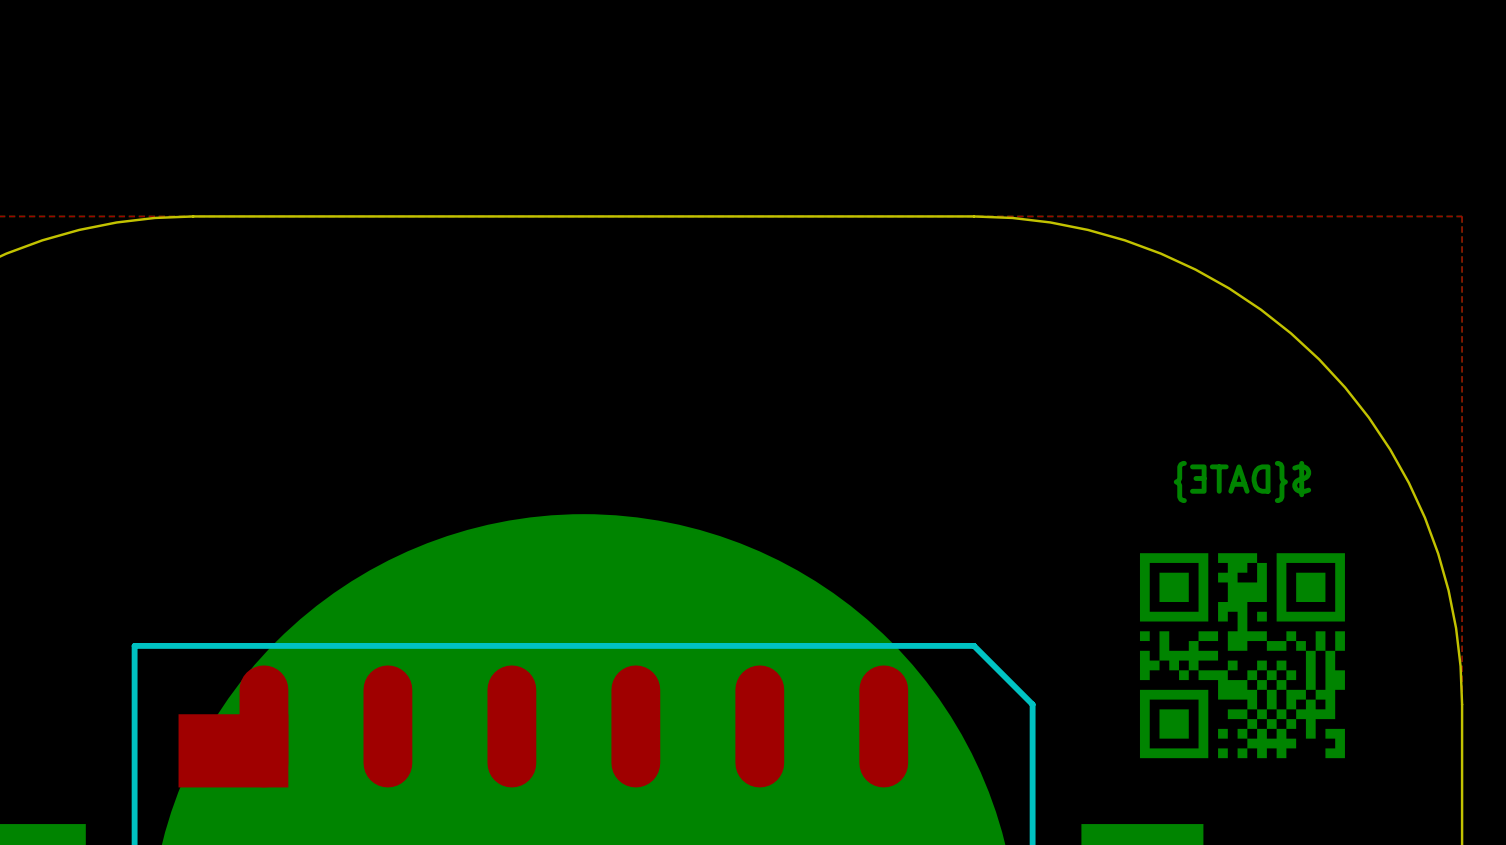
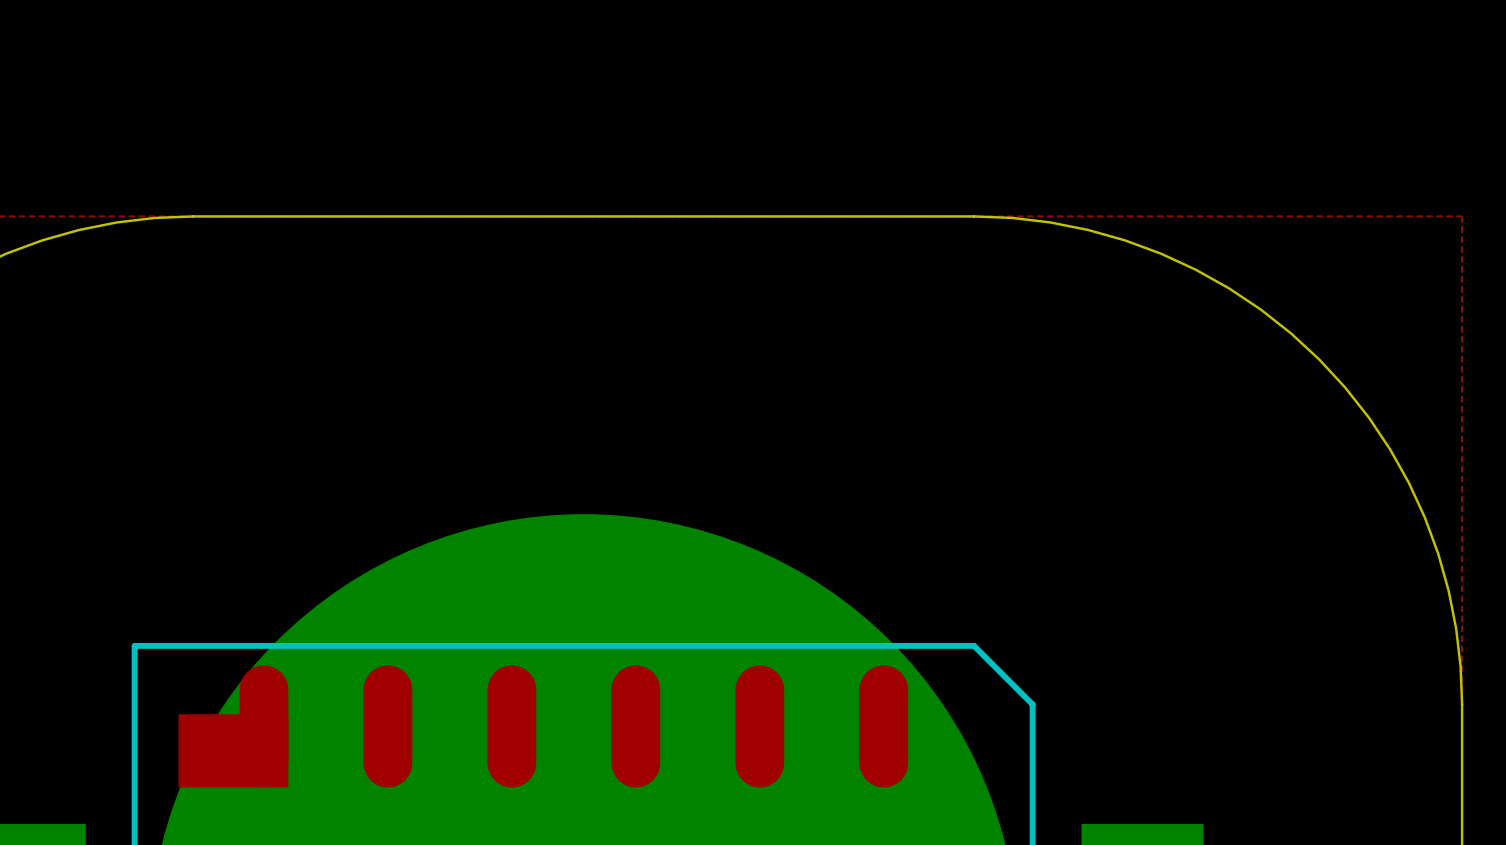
part: (1242, 655) -> none

